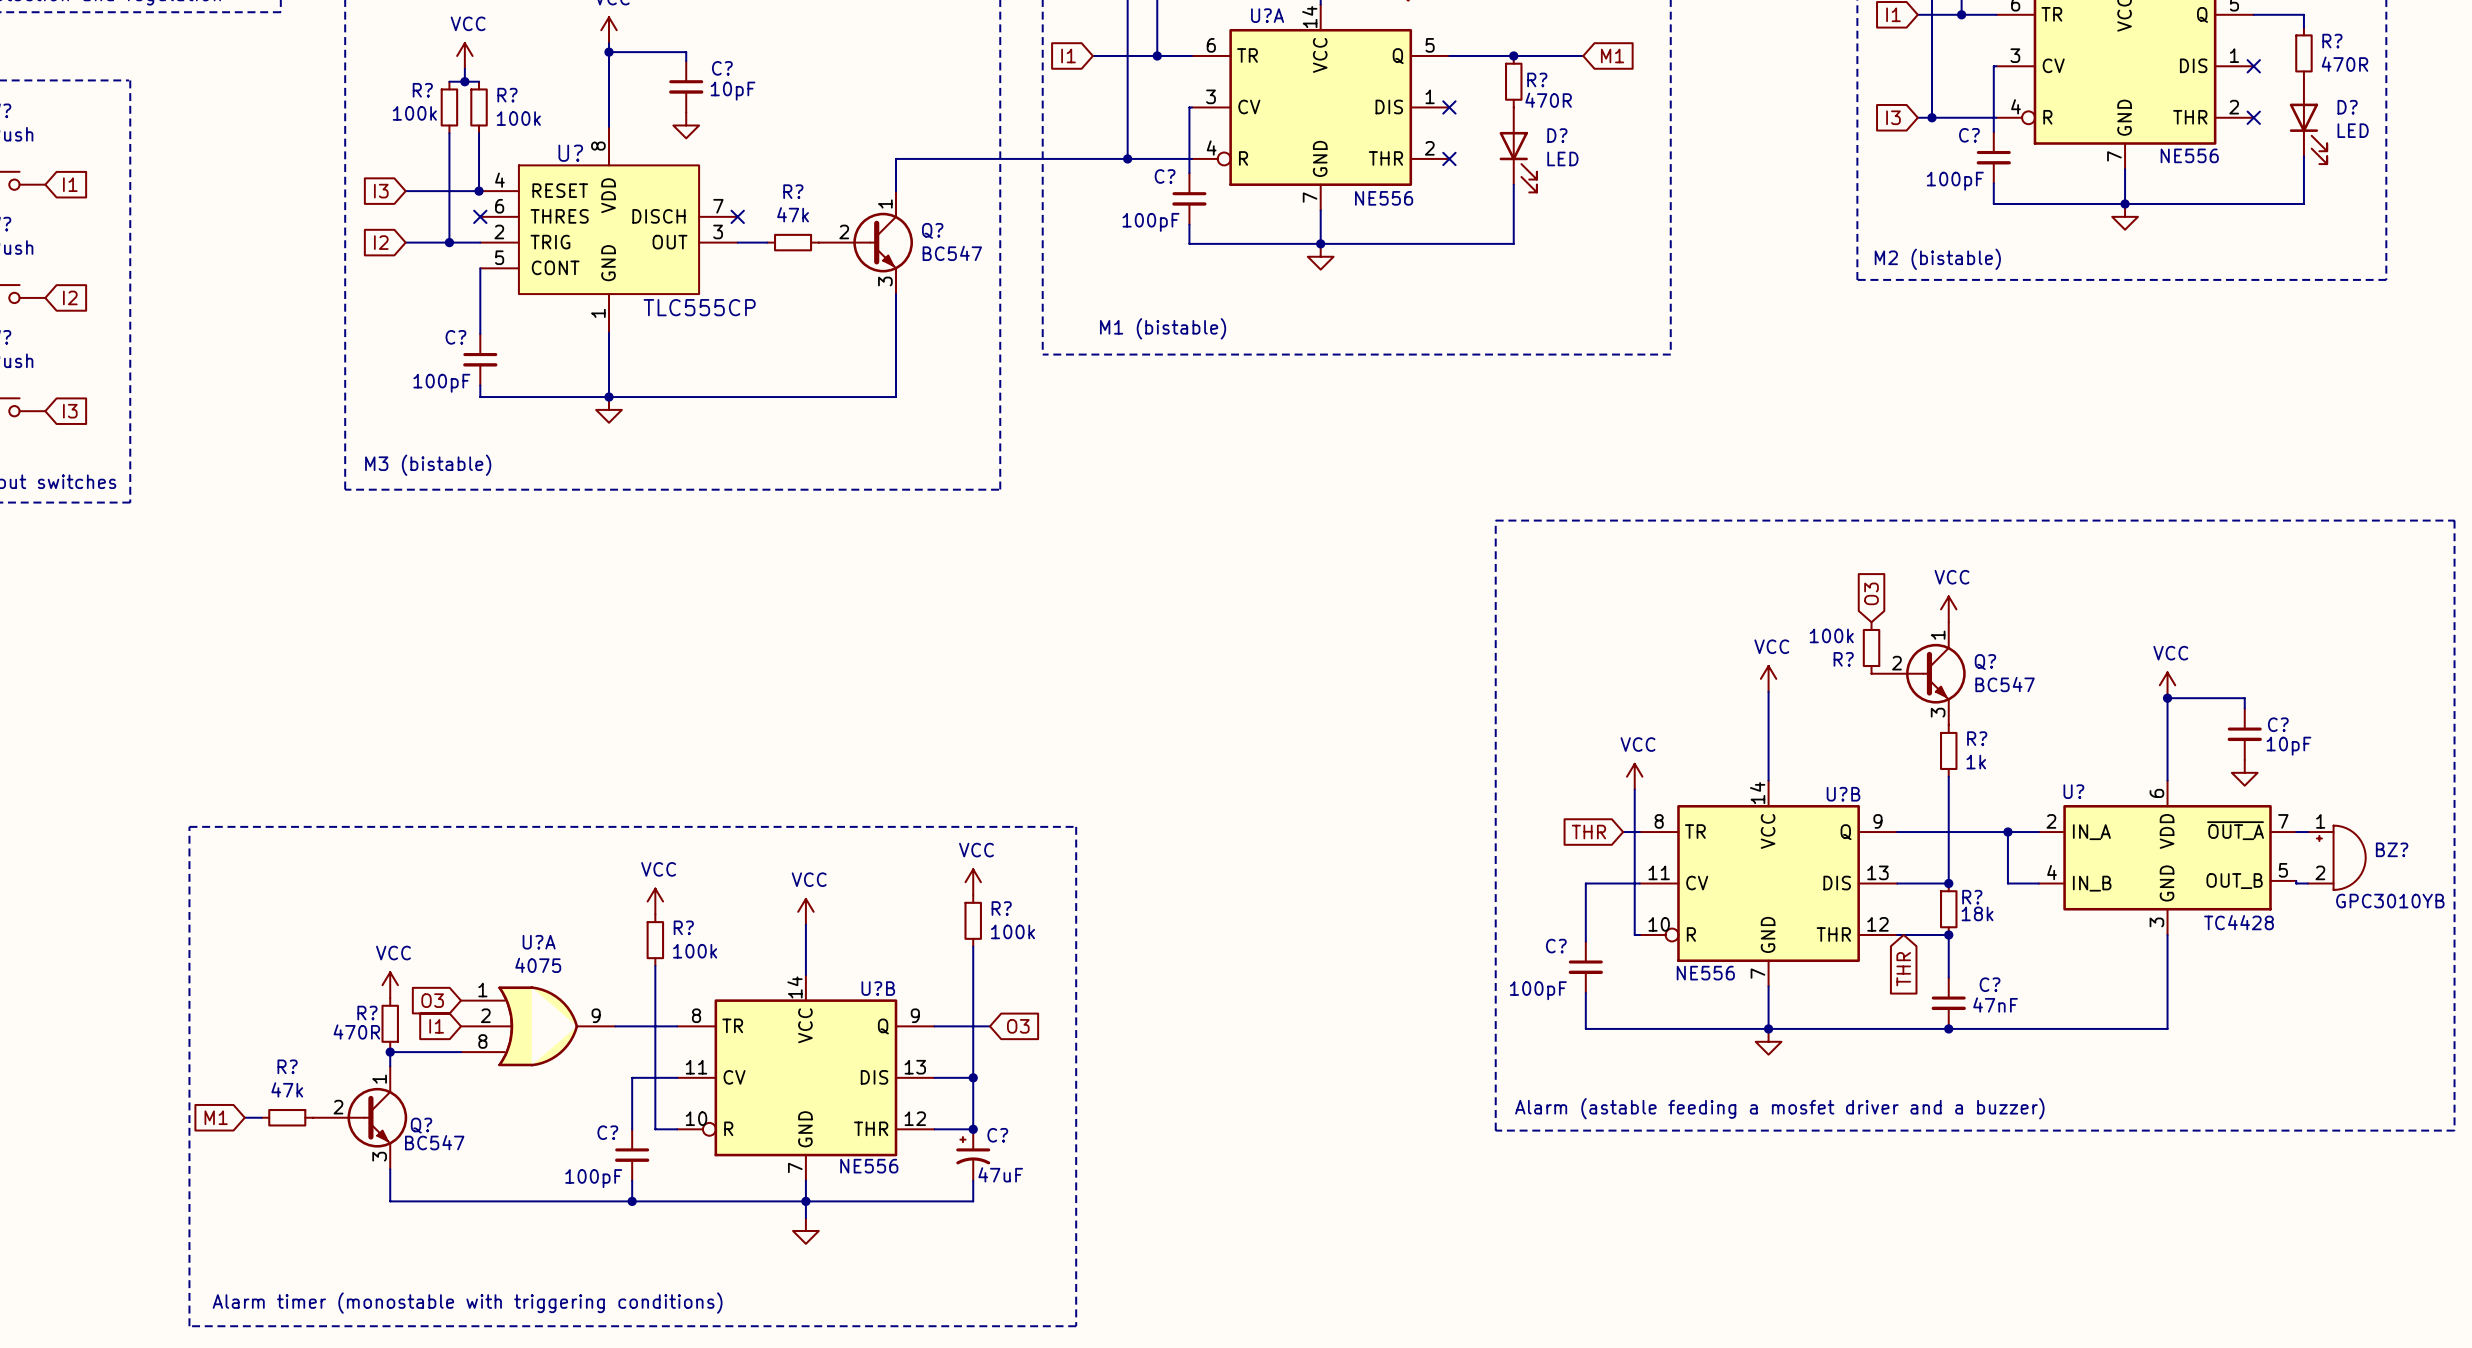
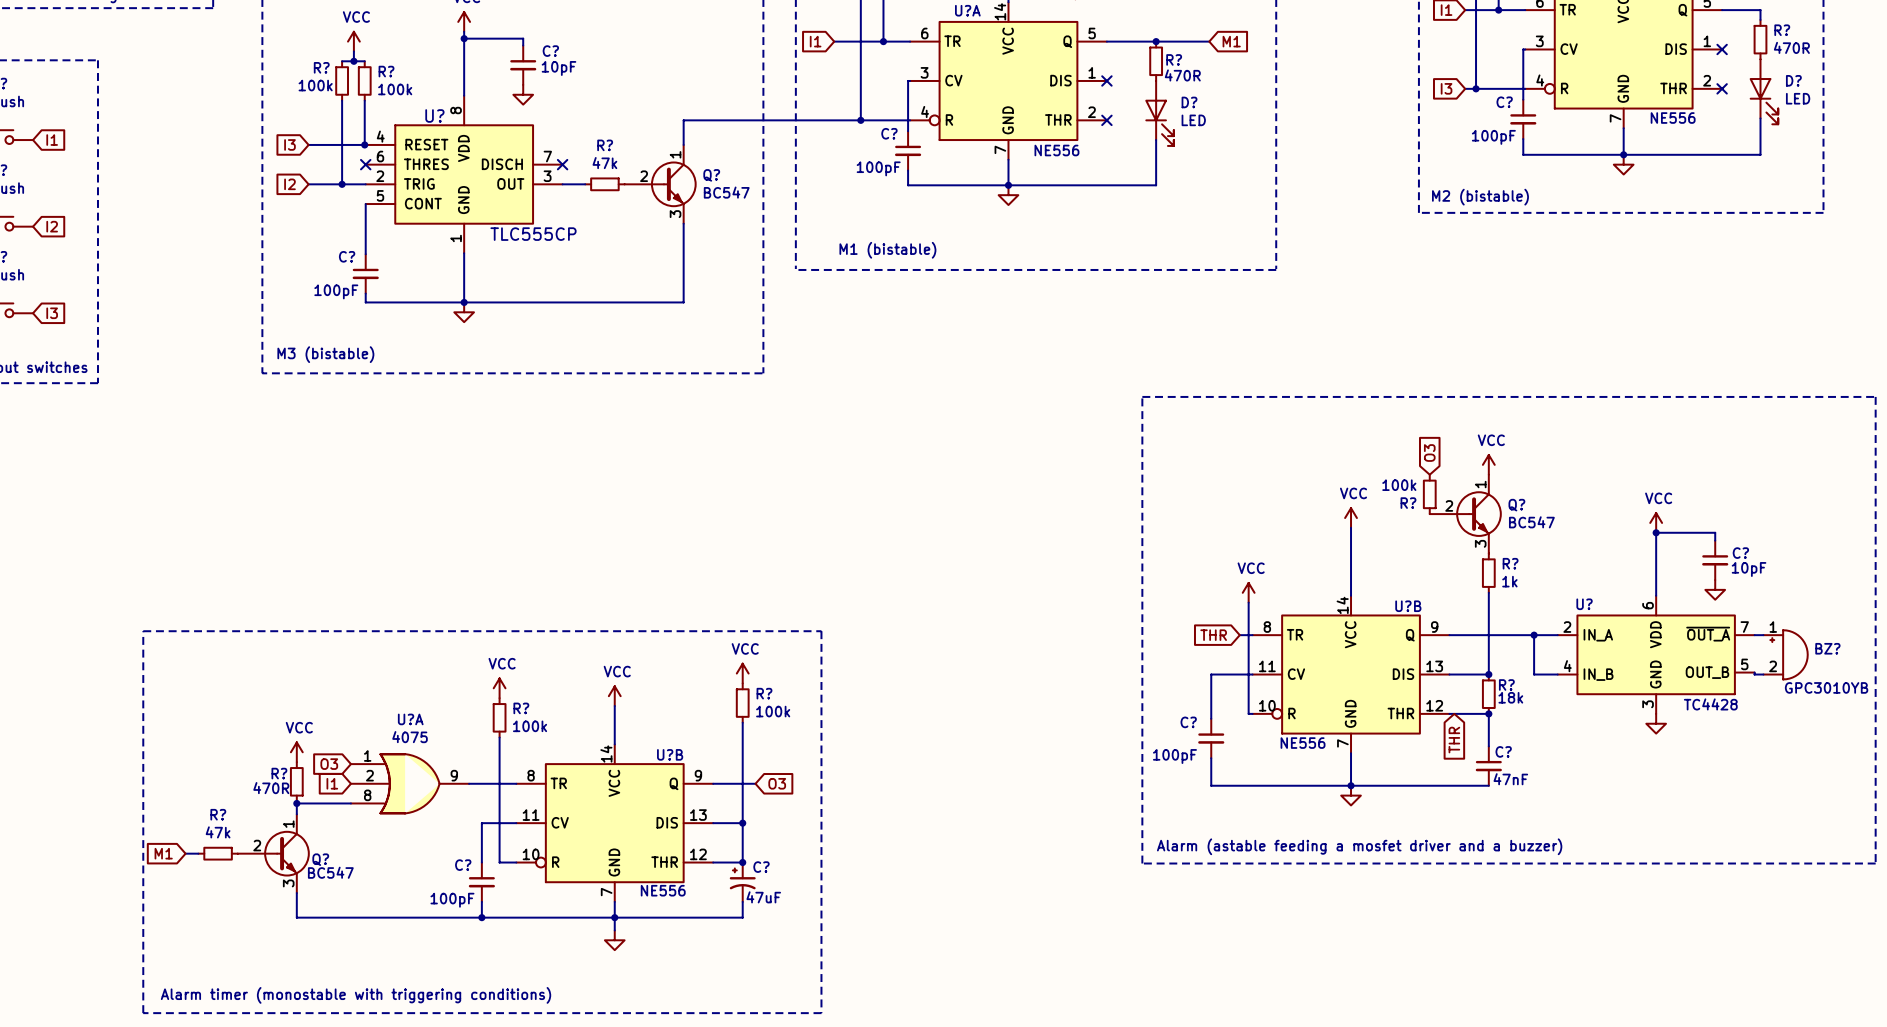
wire: (2167, 934) (2167, 1028) (1948, 1028) -> none
power symbol: none -> (1656, 723)
C? name position: C? (1990, 984) -> C? (1503, 751)
C? value position: 47nF (1995, 1004) -> 47nF (1510, 779)
junction: (1948, 1028) -> none

